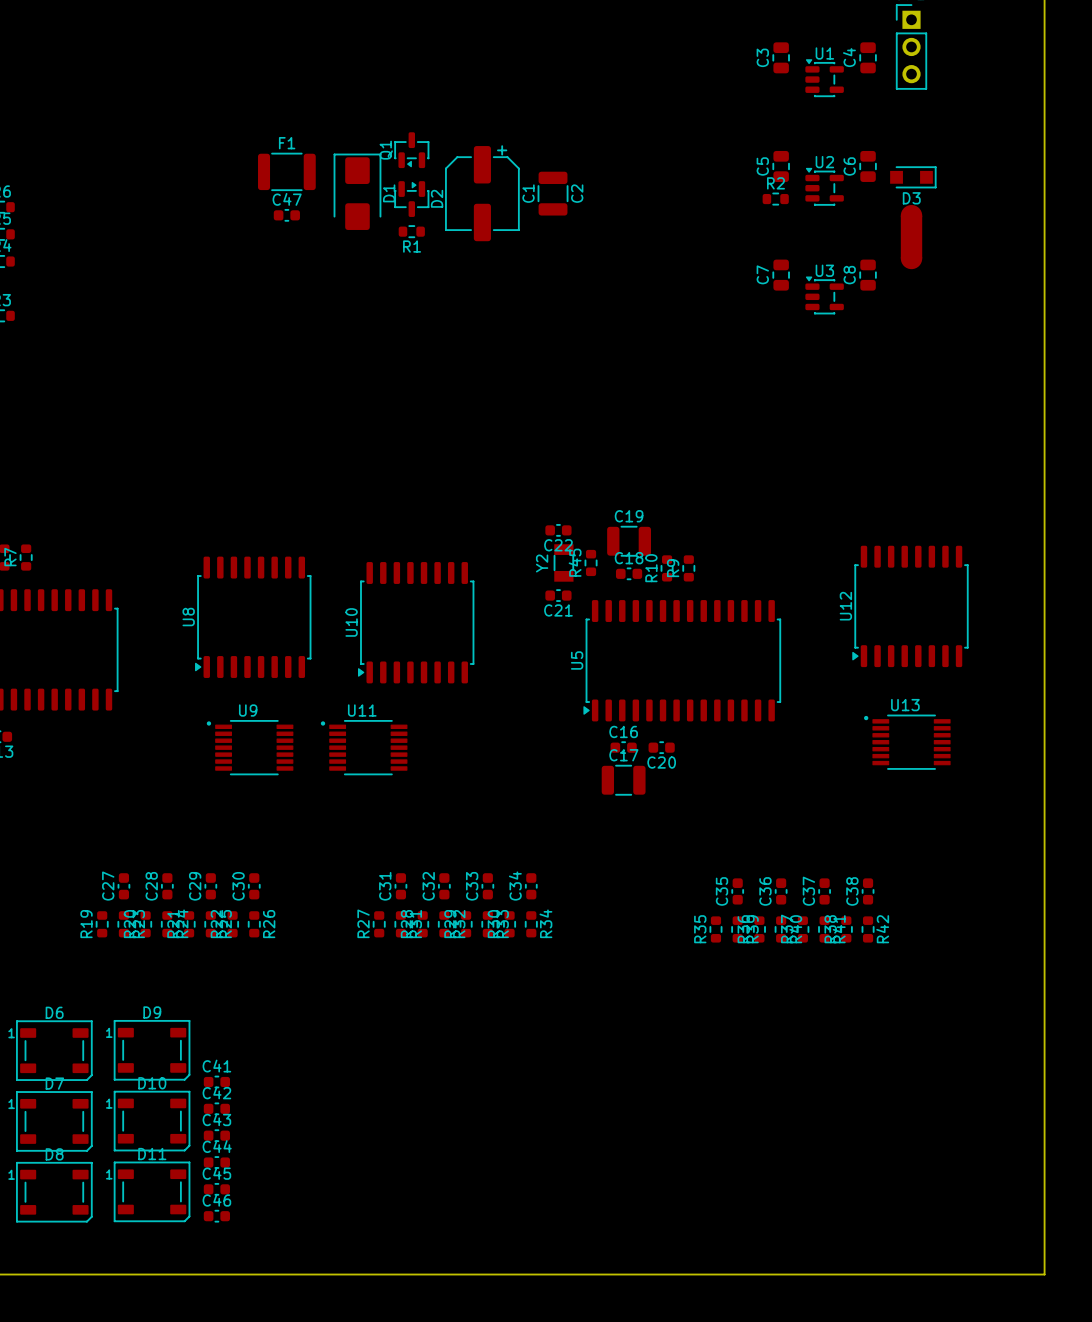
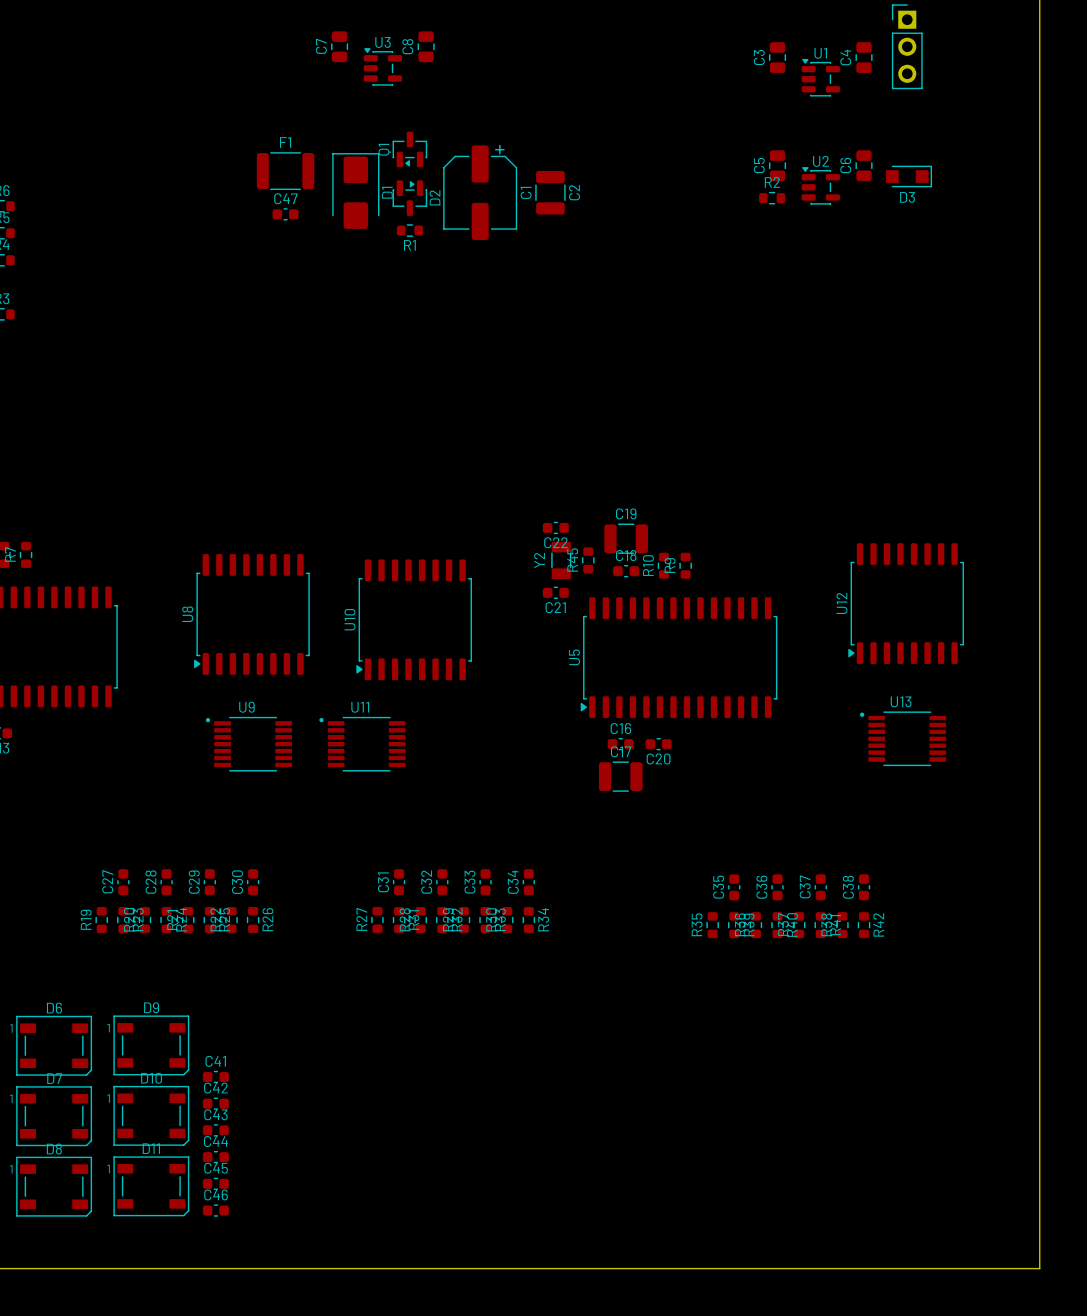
part: (911, 237) -> none
C7 position: (781, 275) -> (339, 46)
C8 position: (868, 275) -> (426, 46)
U3 position: (824, 295) -> (382, 66)

